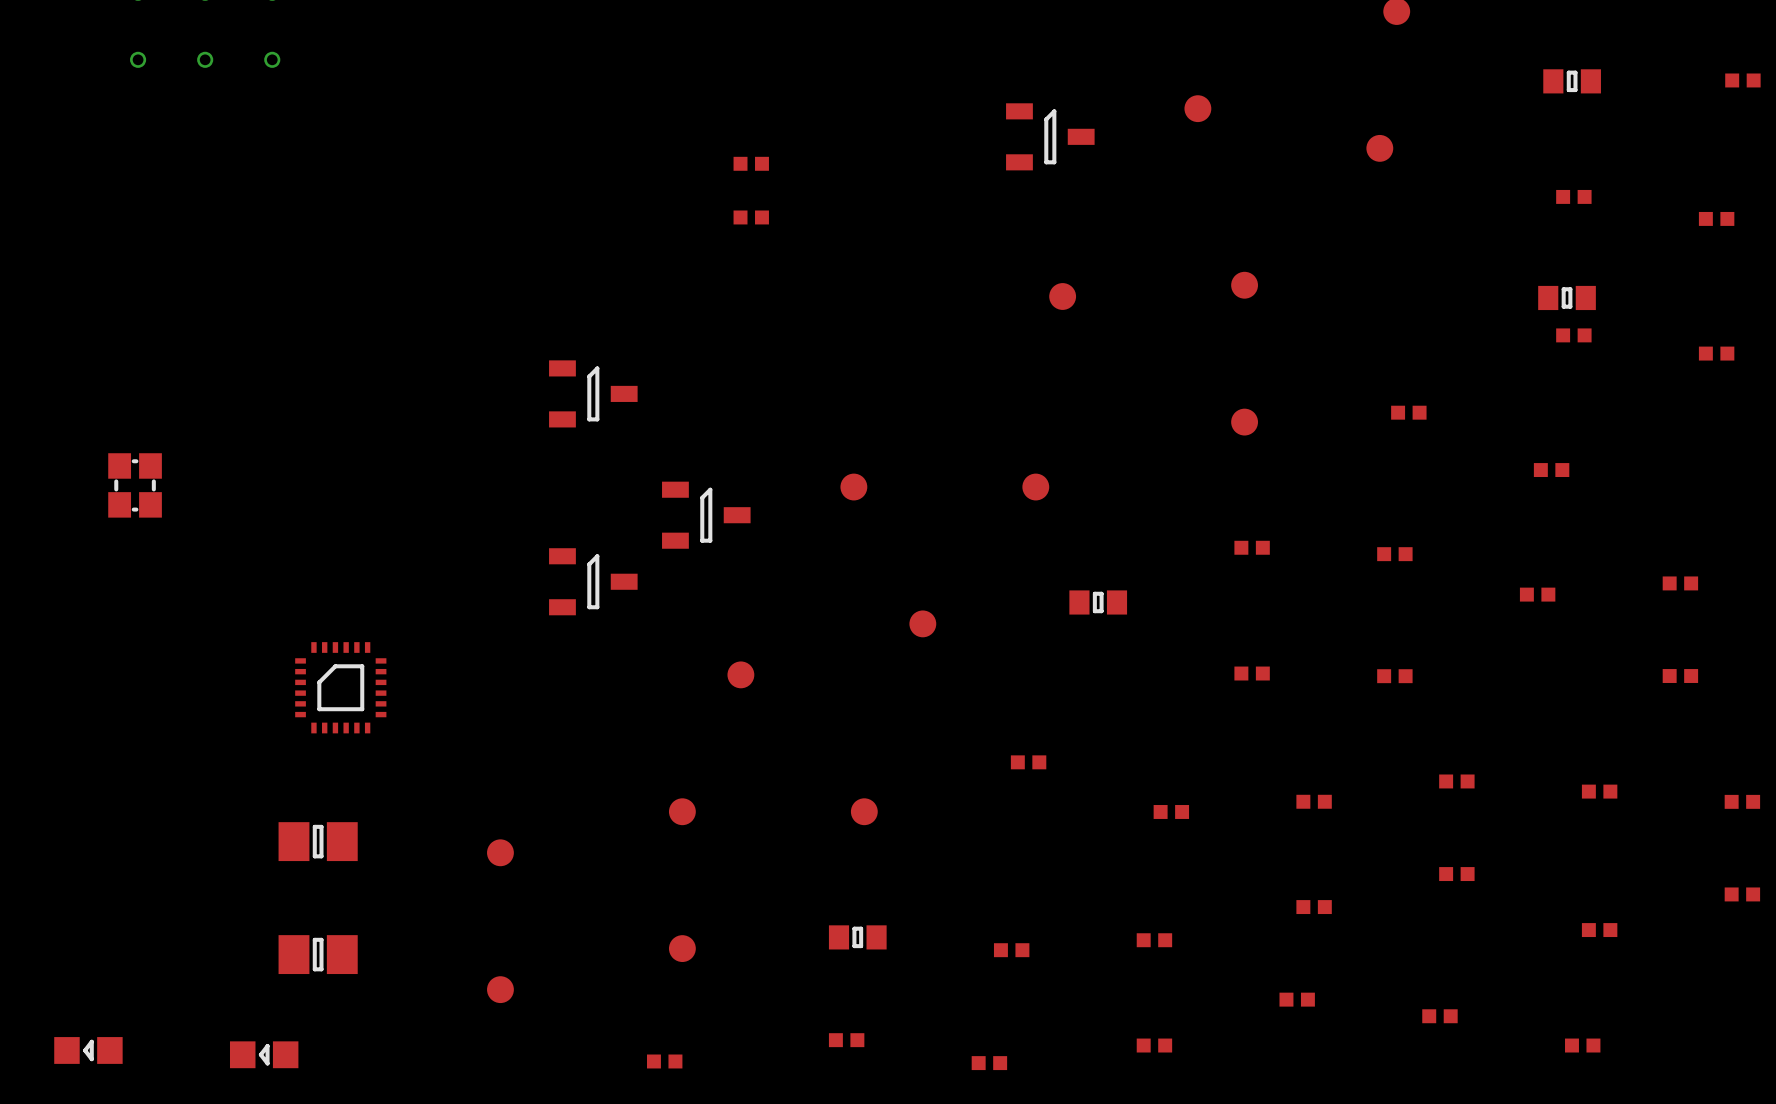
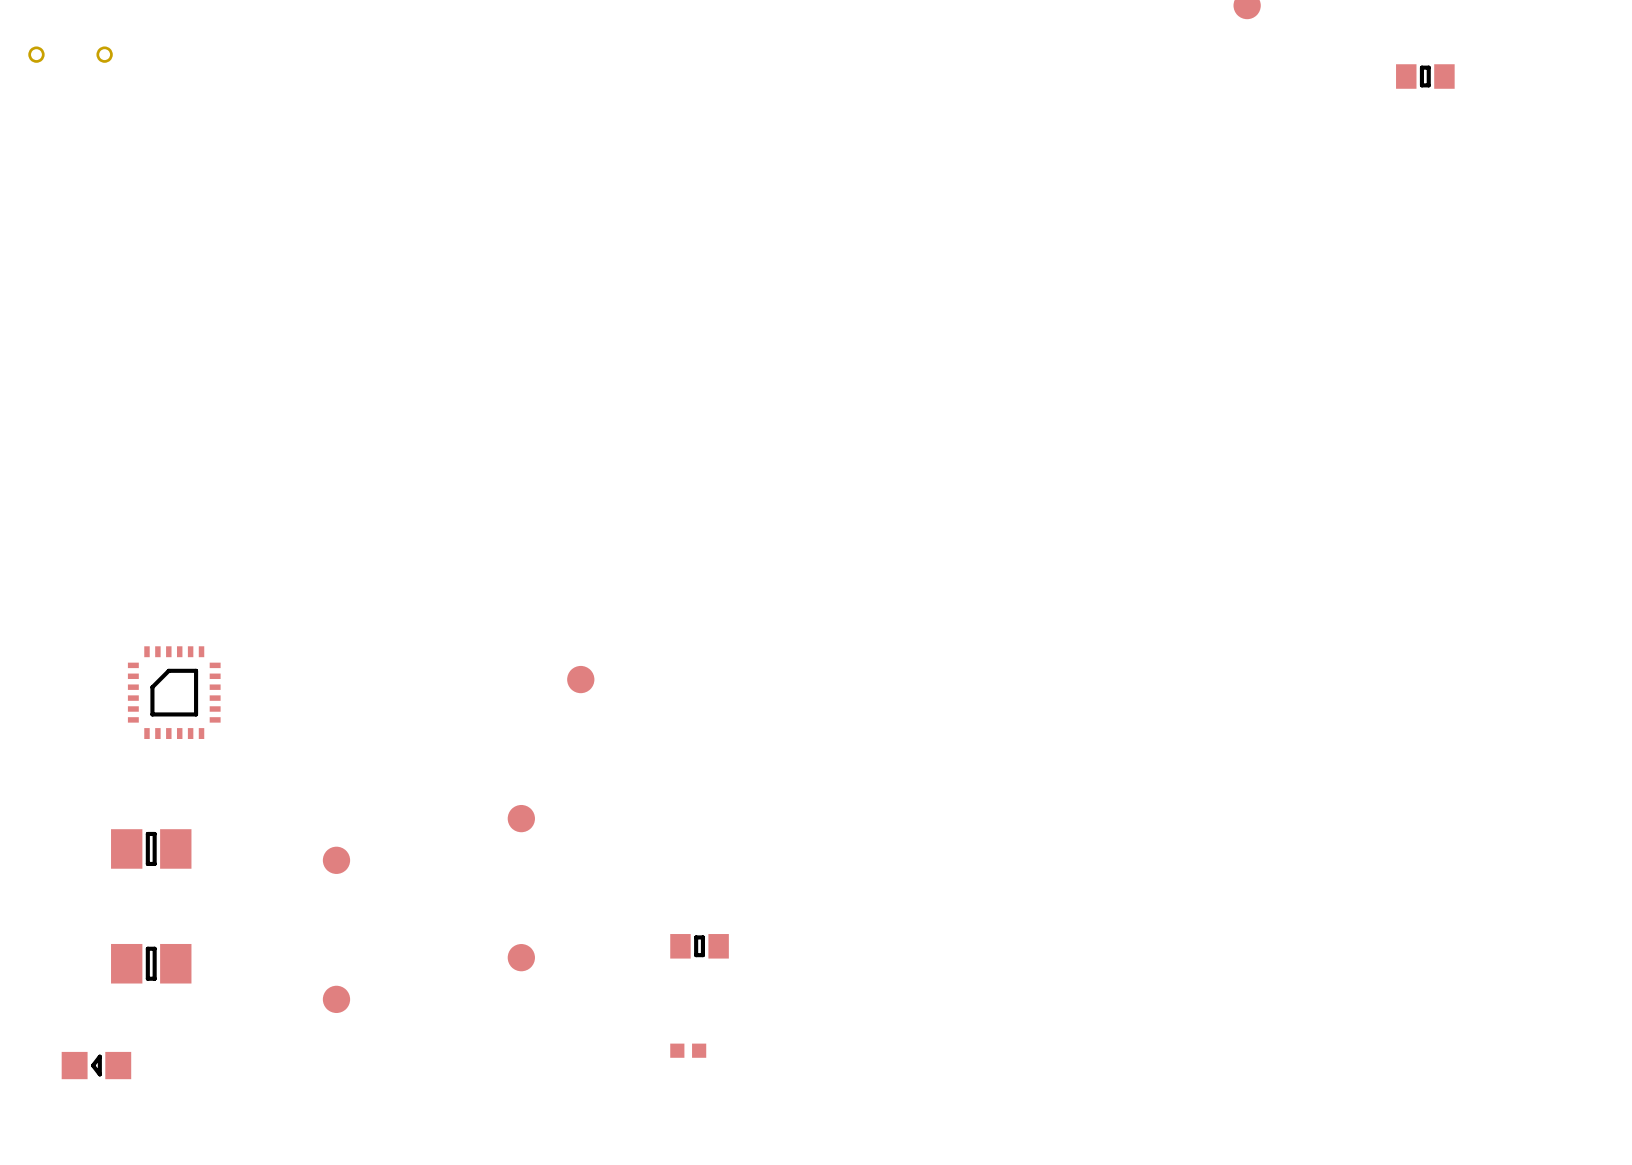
part: (1742, 80) -> none
part: (1197, 108) -> none
part: (1050, 136) -> none
part: (1379, 148) -> none
part: (751, 163) -> none
part: (1573, 196) -> none
part: (751, 217) -> none
part: (1716, 218) -> none
part: (1244, 285) -> none
part: (1062, 296) -> none
part: (1567, 297) -> none
part: (1573, 335) -> none
part: (1716, 353) -> none
part: (593, 393) -> none
part: (1408, 412) -> none
part: (1244, 422) -> none
part: (1551, 470) -> none
part: (853, 487) -> none
part: (1035, 487) -> none
part: (706, 515) -> none
part: (1252, 547) -> none
part: (1394, 554) -> none
part: (593, 581) -> none
part: (1680, 583) -> none
part: (1537, 594) -> none
part: (1098, 602) -> none
part: (922, 623) -> none
part: (1252, 673) -> none
part: (1394, 676) -> none
part: (1680, 676) -> none
part: (1028, 762) -> none
part: (1456, 781) -> none
part: (1599, 791) -> none
part: (1314, 801) -> none
part: (1742, 801) -> none
part: (864, 811) -> none
part: (1171, 811) -> none
part: (1456, 874) -> none
part: (1742, 894) -> none
part: (1314, 907) -> none
part: (1599, 930) -> none
part: (1154, 940) -> none
part: (1011, 950) -> none
part: (1297, 999) -> none
part: (1439, 1016) -> none
part: (1154, 1045) -> none
part: (1582, 1045) -> none
part: (664, 1061) -> none
part: (989, 1063) -> none

